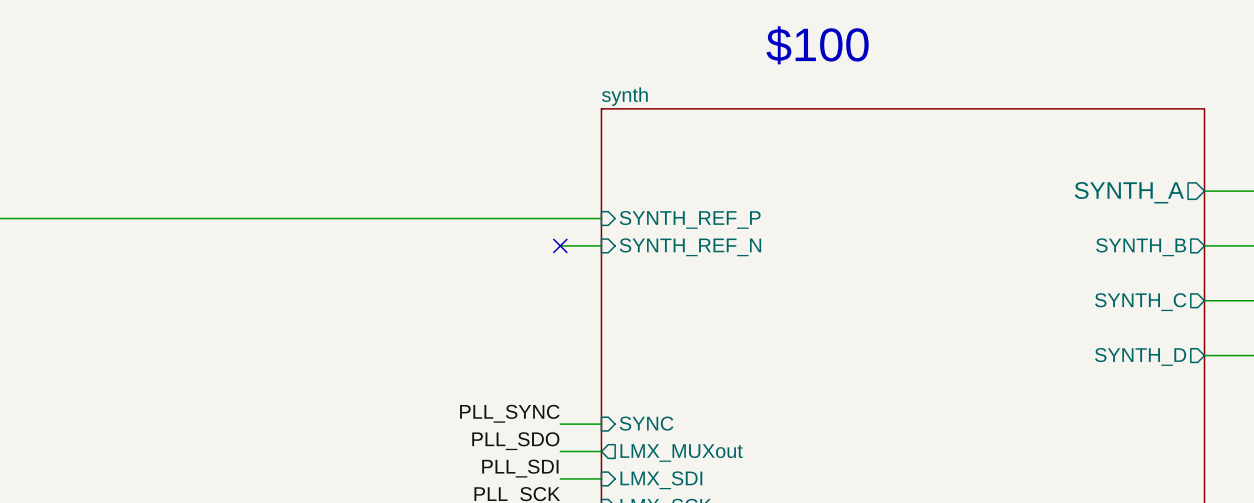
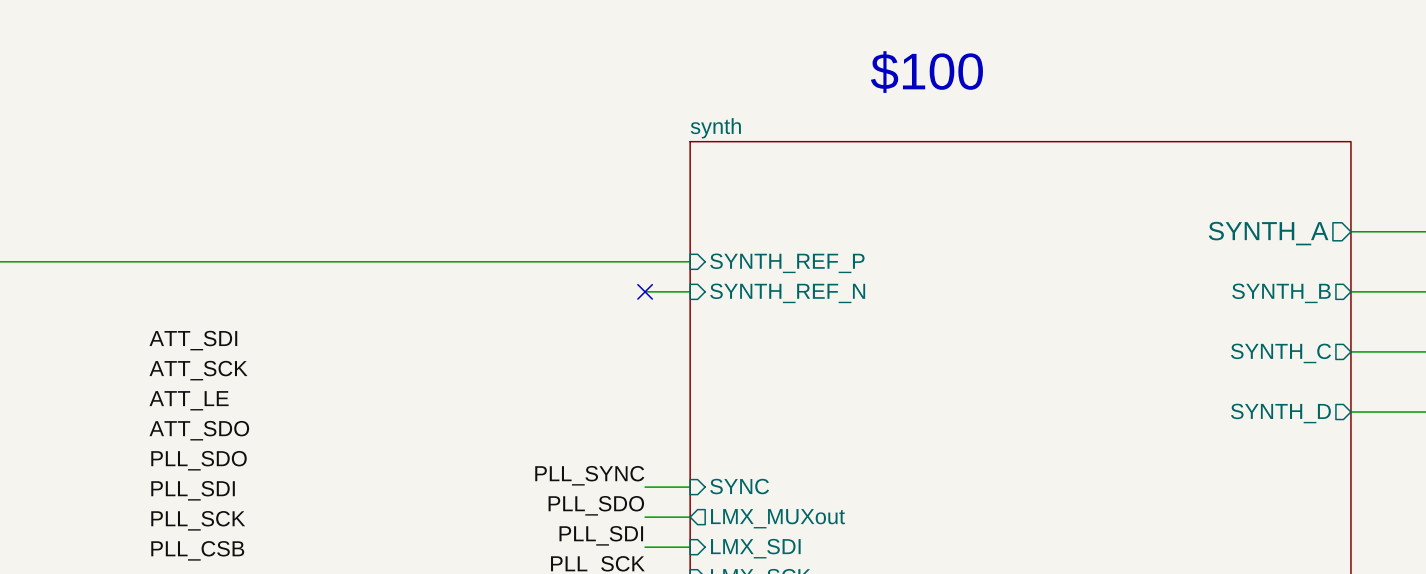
label: none -> ATT_SDI (193, 340)
label: none -> ATT_SCK (198, 370)
label: none -> ATT_LE (189, 400)
label: none -> ATT_SDO (199, 430)
label: none -> PLL_SDO (199, 460)
label: none -> PLL_SDI (193, 490)
label: none -> PLL_SCK (198, 520)
label: none -> PLL_CSB (197, 550)

